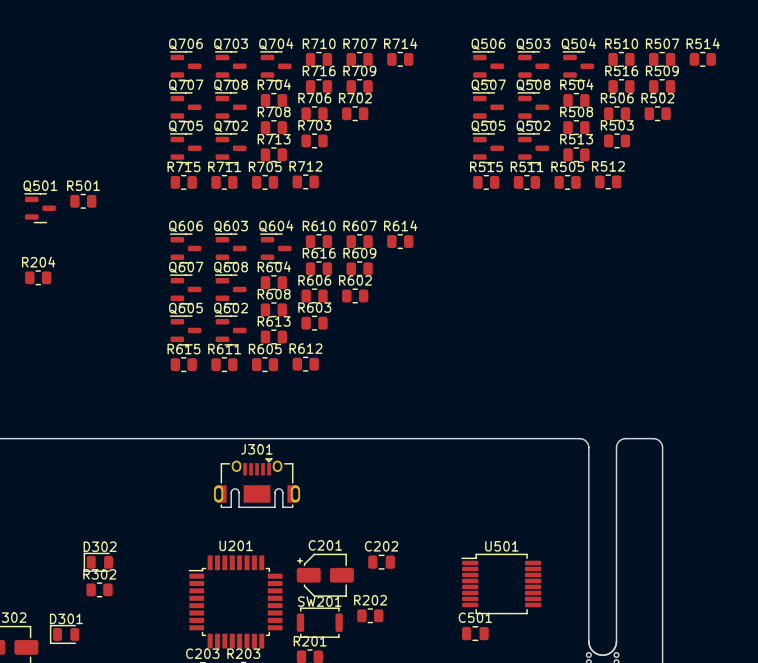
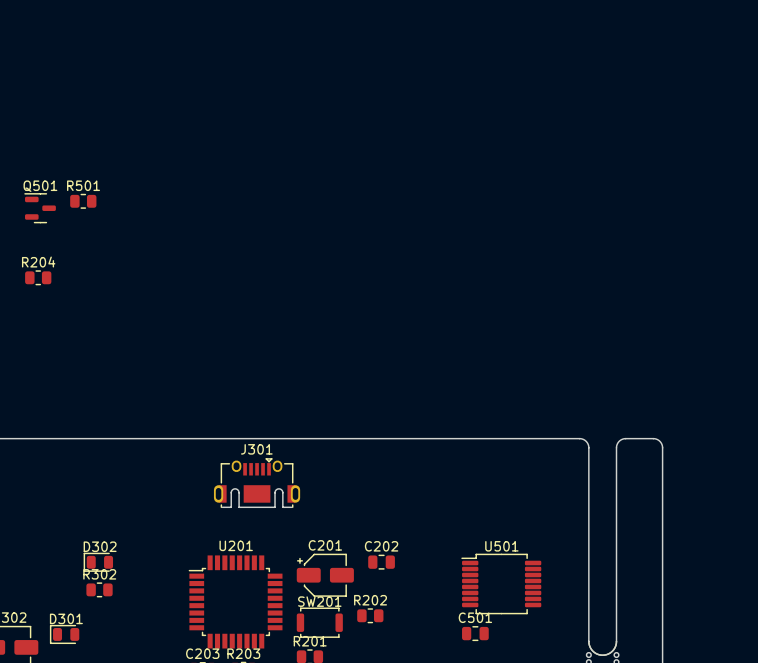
R710: (318, 59) -> none
R707: (359, 59) -> none
R714: (400, 59) -> none
R510: (621, 59) -> none
R507: (662, 59) -> none
R514: (702, 59) -> none
Q706: (185, 66) -> none
Q703: (230, 66) -> none
Q704: (275, 66) -> none
Q506: (488, 66) -> none
Q503: (533, 66) -> none
Q504: (578, 66) -> none
R716: (318, 86) -> none
R709: (359, 86) -> none
R516: (621, 86) -> none
R509: (662, 86) -> none
R704: (273, 100) -> none
R504: (576, 100) -> none
Q707: (185, 107) -> none
Q708: (230, 107) -> none
Q507: (488, 107) -> none
Q508: (533, 107) -> none
R706: (314, 113) -> none
R702: (355, 113) -> none
R506: (617, 113) -> none
R502: (657, 113) -> none
R708: (273, 127) -> none
R508: (576, 127) -> none
R703: (314, 140) -> none
R503: (617, 140) -> none
Q705: (185, 148) -> none
Q702: (230, 148) -> none
Q505: (488, 148) -> none
Q502: (533, 148) -> none
R713: (273, 154) -> none
R513: (576, 154) -> none
R712: (305, 181) -> none
R512: (608, 181) -> none
R715: (183, 182) -> none
R711: (224, 182) -> none
R705: (265, 182) -> none
R515: (486, 182) -> none
R511: (526, 182) -> none
R505: (567, 182) -> none
R610: (318, 241) -> none
R607: (359, 241) -> none
R614: (400, 241) -> none
Q606: (185, 248) -> none
Q603: (230, 248) -> none
Q604: (275, 248) -> none
R616: (318, 268) -> none
R609: (359, 268) -> none
R604: (273, 282) -> none
Q607: (185, 289) -> none
Q608: (230, 289) -> none
R606: (314, 295) -> none
R602: (355, 295) -> none
R608: (273, 309) -> none
R603: (314, 323) -> none
Q605: (185, 330) -> none
Q602: (230, 330) -> none
R613: (273, 336) -> none
R615: (183, 364) -> none
R611: (224, 364) -> none
R605: (265, 364) -> none
R612: (305, 364) -> none

